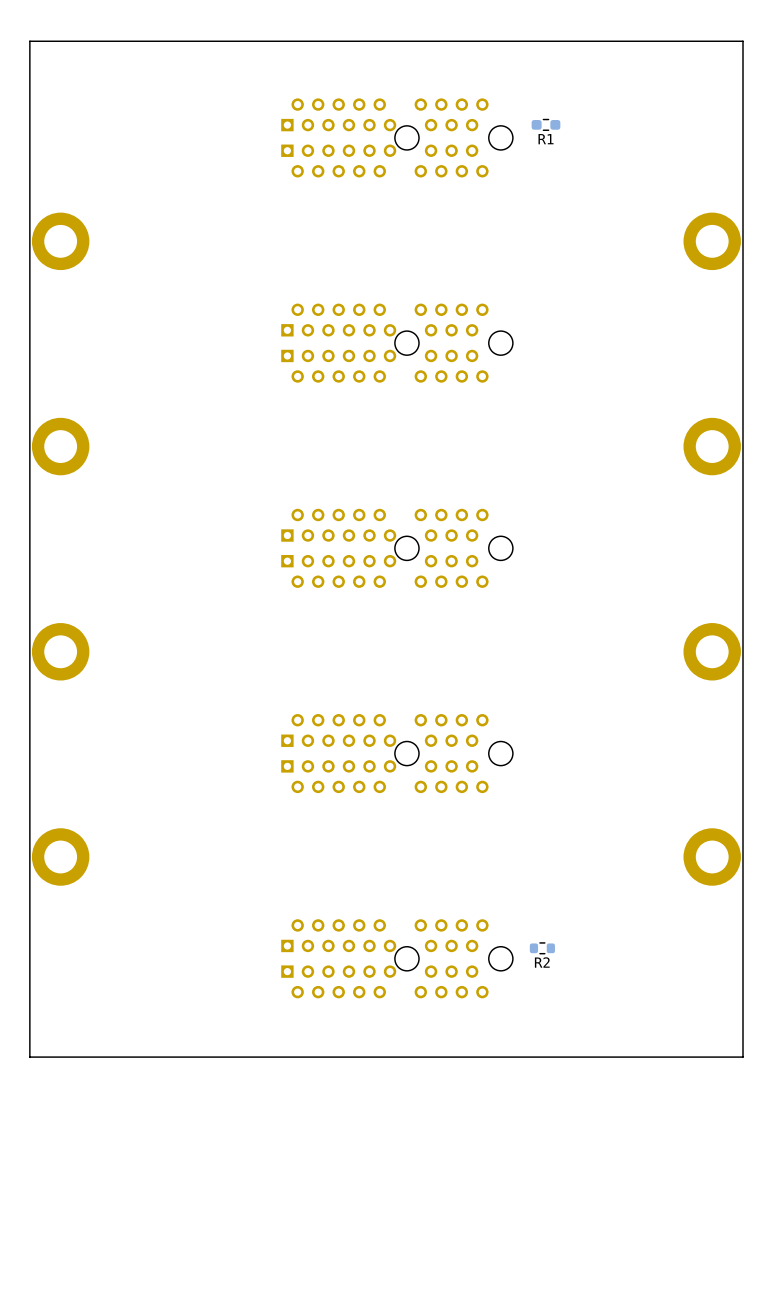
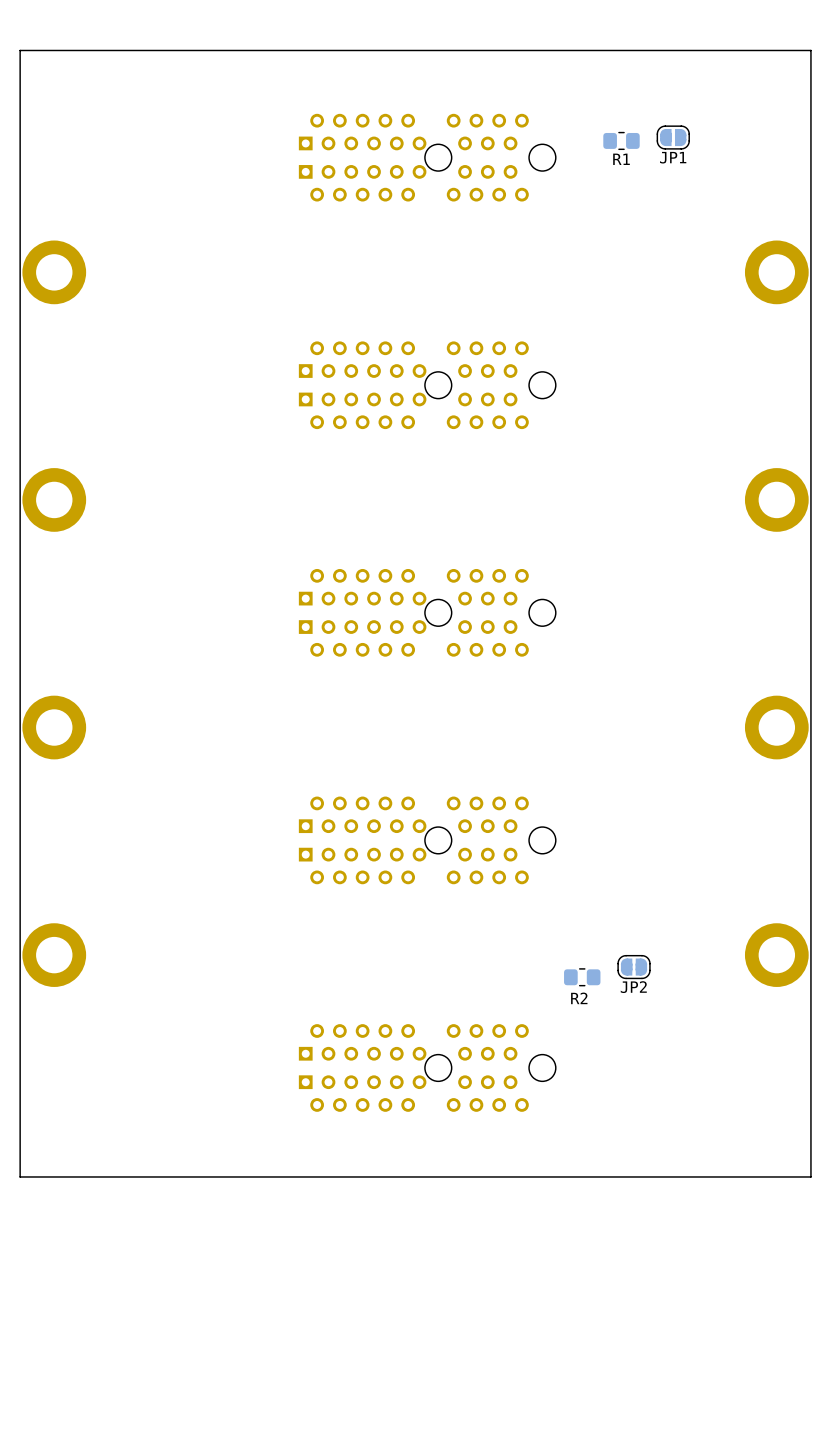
R1 footprint: [531, 118, 561, 131] -> [603, 131, 640, 150]
JP1: none -> (673, 137)
JP2: none -> (634, 967)
R2 footprint: [529, 942, 555, 955] -> [564, 968, 601, 987]

